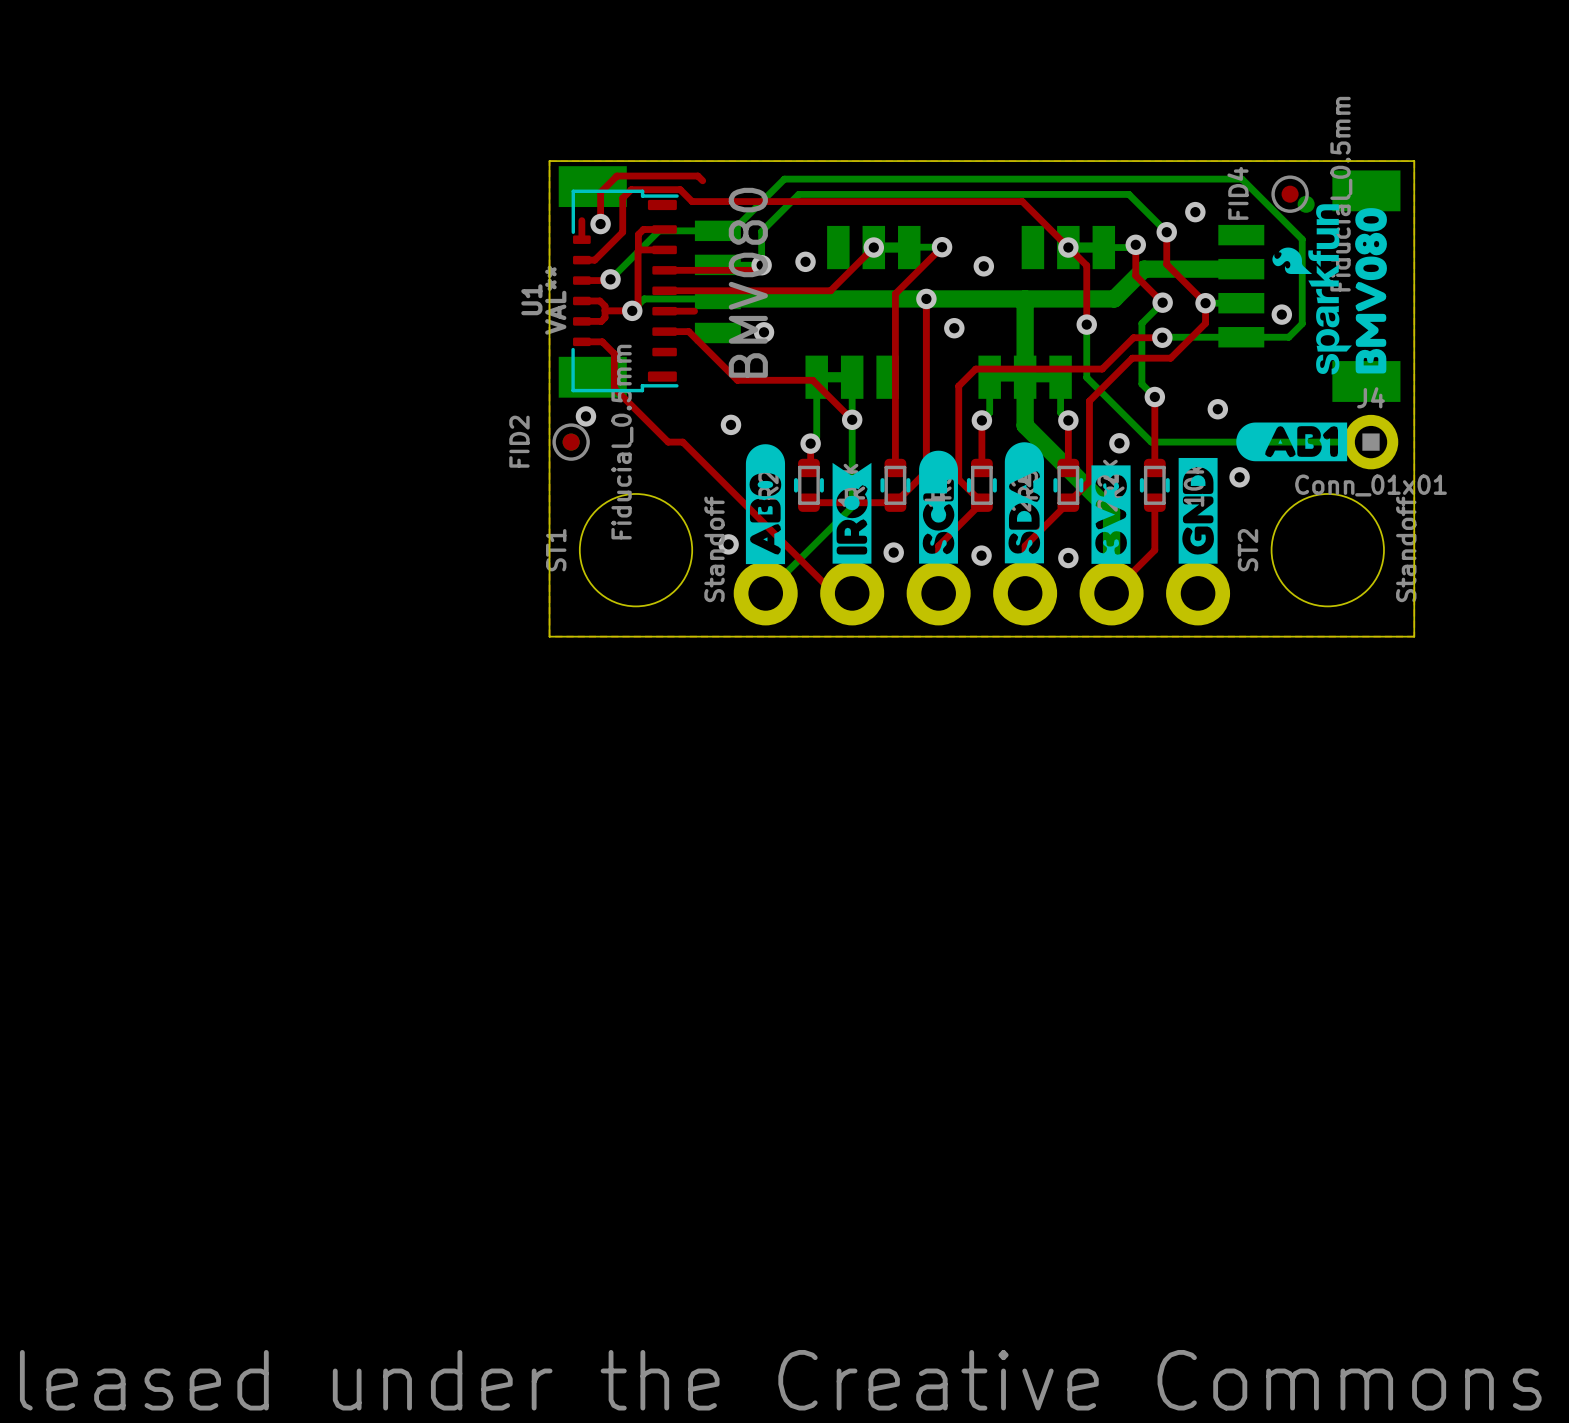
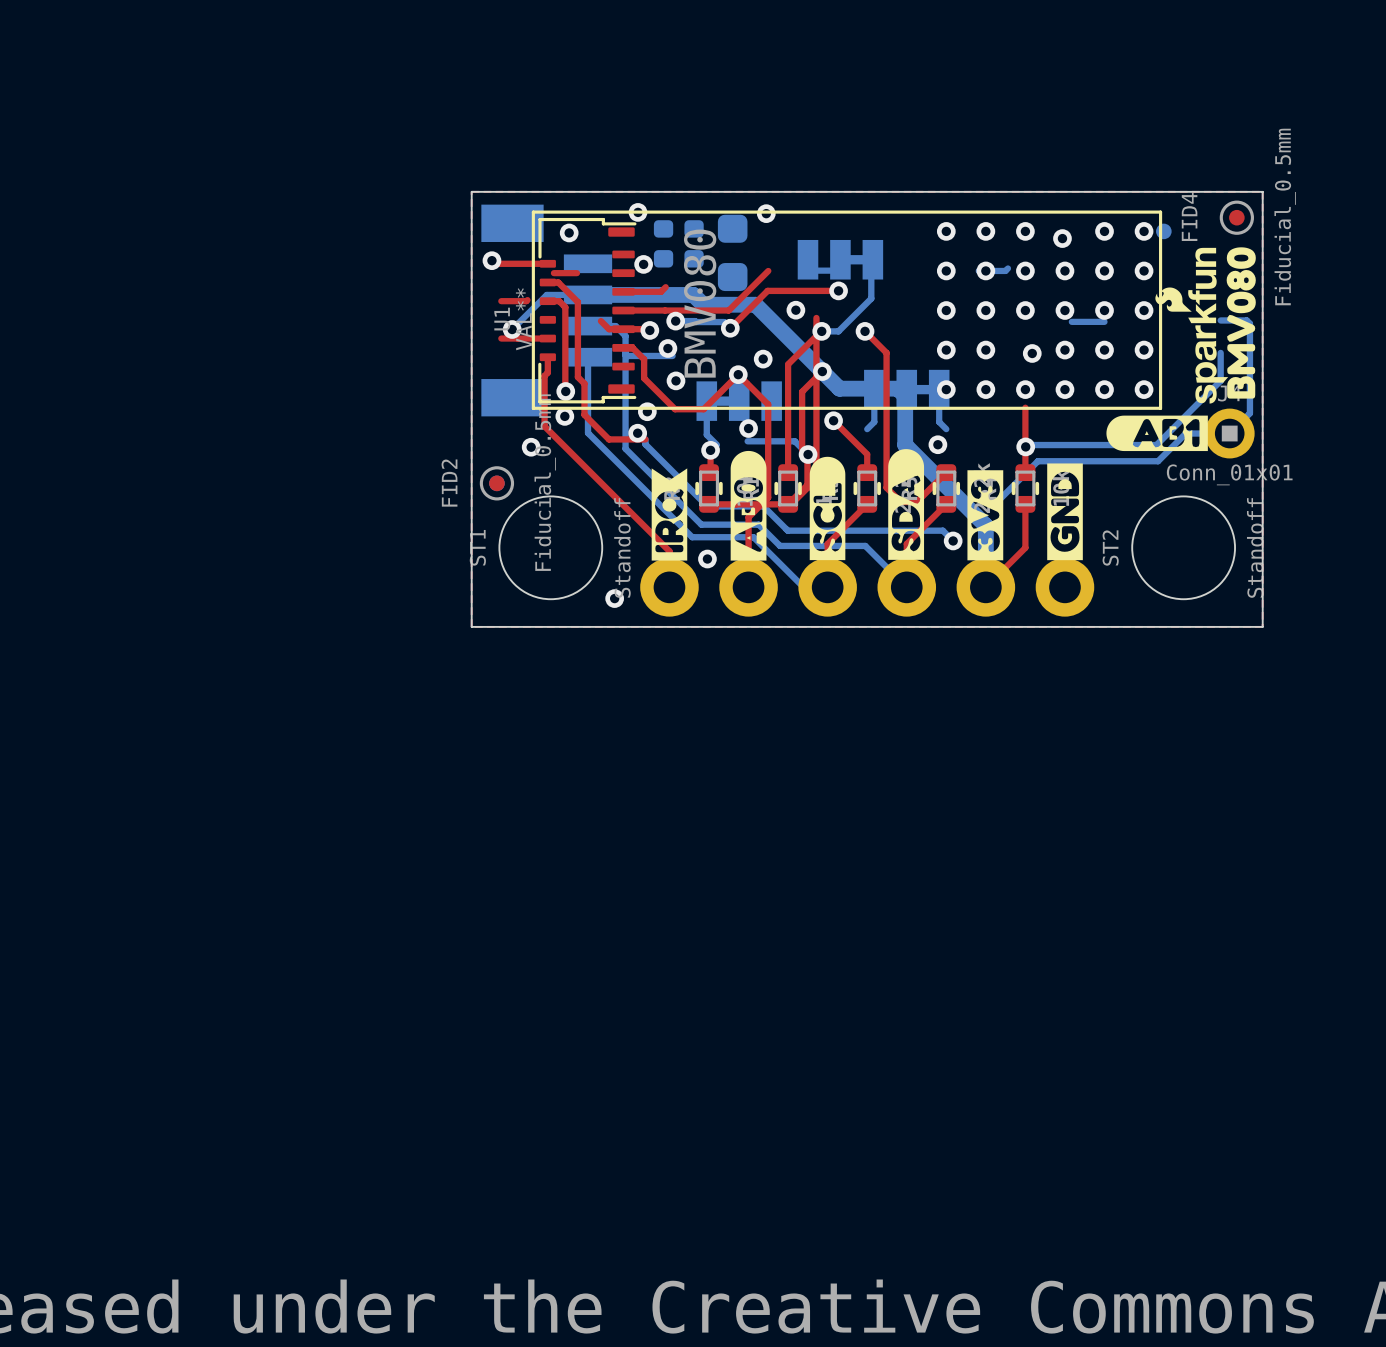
part footprint: [558, 166, 741, 398] -> [481, 204, 613, 417]
top track: (702, 180) (697, 176) (616, 176) (600, 192) (600, 224) -> none
line: none -> (533, 212) (1160, 212) (1160, 408) (533, 408) (533, 212)
via: none -> (638, 212)
via: none -> (766, 213)
FID4 position: (1290, 194) -> (1236, 217)
via: none -> (946, 231)
via: none -> (985, 231)
via: none -> (1025, 231)
via: none -> (1104, 231)
via: none -> (1144, 231)
via: none -> (569, 232)
part: none -> (663, 243)
part: none -> (694, 243)
top track: (581, 220) (581, 239) -> none
via: (600, 224) -> none
part: none -> (732, 252)
top track: (664, 229) (643, 229) (638, 234) (638, 305) (632, 310) (605, 310) -> none
top track: (1166, 232) (1166, 264) (1205, 303) (1205, 323) (1170, 358) (1132, 358) (1089, 401) (1089, 481) (1068, 502) -> none
bottom track: (1166, 232) (1128, 194) (798, 194) (761, 231) (761, 265) (718, 265) -> none
via: (1166, 232) -> none
part: none -> (840, 259)
bottom track: none -> (871, 259) (871, 298) (838, 331) (821, 331)
top track: none -> (491, 260) (495, 263) (547, 263)
via: none -> (491, 260)
via: none -> (643, 264)
top track: (1135, 244) (1135, 275) (1162, 302) -> none
via: (1135, 244) -> none
part: (873, 247) -> none
via: (873, 247) -> none
top track: (942, 247) (895, 293) (895, 349) -> (821, 331) (788, 364)
via: (942, 247) -> none
top track: (1068, 247) (1022, 201) (692, 201) (680, 189) (631, 189) (622, 198) (622, 232) (594, 260) (581, 260) -> none
top track: (1068, 247) (1086, 265) (1086, 324) -> none
part: (1068, 247) -> none
via: none -> (985, 270)
via: none -> (1025, 270)
via: none -> (1064, 270)
via: none -> (1104, 270)
via: none -> (1144, 270)
top track: none -> (547, 282) (558, 282) (577, 302) (577, 377) (584, 383) (584, 414) (609, 439) (645, 439)
via: (805, 261) -> none
via: (761, 265) -> none
via: (983, 266) -> none
top track: none -> (838, 290) (767, 290) (730, 328)
via: none -> (838, 290)
bottom track: (1241, 269) (1144, 269) (1114, 298) (644, 298) (632, 310) -> none
top track: (664, 270) (715, 270) -> none
bottom track: (610, 279) (659, 230) (732, 230) (784, 179) (1242, 179) (1302, 239) (1302, 323) (1288, 337) (1162, 337) -> none
via: (610, 279) -> none
top track: none -> (547, 301) (559, 301) (565, 307) (565, 391)
part: (1309, 286) -> none
drawing position: (1312, 289) -> (1191, 325)
U1 position: (625, 290) -> (587, 310)
top track: (664, 290) (715, 290) -> none
via: none -> (795, 310)
via: none -> (946, 310)
via: none -> (985, 310)
via: none -> (1104, 310)
via: none -> (1144, 310)
drawing position: (1371, 290) -> (1241, 322)
via position: (926, 298) -> (821, 331)
bottom track: (1025, 298) (1025, 425) (1111, 512) (1111, 526) -> (512, 329) (546, 294) (693, 294) (703, 304) (755, 304) (839, 388) (897, 388) (905, 396) (905, 445) (985, 525)
top track: (581, 300) (599, 300) (605, 306) (605, 317) (601, 321) -> (547, 338) (519, 338)
bottom track: none -> (1220, 320) (1246, 320) (1249, 323) (1249, 413) (1229, 433) (1185, 433) (1158, 461) (1037, 461) (998, 500) (993, 500)
top track: none -> (600, 321) (609, 329) (649, 330)
bottom track: none -> (675, 321) (724, 322) (730, 328)
via: none -> (675, 321)
bottom track: (1162, 302) (1141, 323) (1141, 384) (1154, 396) -> none
via position: (1162, 302) -> (1025, 310)
via position: (1205, 303) -> (1064, 310)
bottom track: none -> (588, 326) (615, 326) (625, 336) (625, 448) (701, 524) (758, 524) (780, 545) (865, 545) (906, 587)
via: (632, 310) -> none
via: none -> (730, 328)
via: none -> (512, 329)
top track: (664, 311) (694, 311) -> none
via: none -> (649, 330)
via: none -> (865, 331)
via position: (1281, 314) -> (1144, 350)
bottom track: (1086, 324) (1086, 377) (1151, 442) (1371, 442) -> none
via position: (1086, 324) -> (946, 350)
via: (954, 328) -> none
top track: (664, 331) (688, 331) (737, 380) (812, 380) (852, 419) -> none
via: none -> (985, 350)
via: none -> (1064, 350)
via: none -> (1104, 350)
top track: (1162, 337) (1133, 337) (1102, 369) (975, 369) (958, 386) (958, 479) (981, 502) -> none
bottom track: none -> (1220, 352) (1220, 380) (1156, 445) (1027, 445) (1025, 446)
bottom track: none -> (625, 355) (672, 355)
top track: (581, 341) (602, 341) (614, 353) (614, 388) (668, 442) (682, 442) (834, 593) (852, 593) -> (623, 347) (632, 347) (644, 359) (644, 378) (675, 409) (703, 409) (738, 374) (768, 404) (768, 497) (748, 517) (748, 587)
top track: none -> (547, 357) (547, 372) (544, 375) (544, 426) (669, 551) (669, 587)
bottom track: none -> (588, 357) (588, 433) (692, 537) (753, 537) (803, 587) (827, 587)
via: none -> (763, 359)
top track: none -> (822, 371) (802, 391) (802, 449) (807, 455) (807, 487) (791, 504) (788, 504)
via: none -> (822, 371)
via: none -> (738, 374)
via: none -> (676, 380)
bottom track: (816, 377) (816, 437) (810, 443) -> none
bottom track: (852, 377) (852, 506) (765, 593) -> none
part position: (852, 377) -> (739, 401)
via: none -> (946, 389)
via: none -> (985, 389)
via: none -> (1064, 389)
via: none -> (1104, 389)
via: none -> (1144, 389)
via: none -> (565, 391)
bottom track: none -> (706, 401) (706, 434) (716, 444)
via position: (1154, 396) -> (1025, 389)
via: none -> (647, 411)
via: none -> (564, 416)
via: (1217, 409) -> none
via: none -> (833, 420)
via: (585, 416) -> none
top track: (981, 420) (981, 448) -> (833, 420) (867, 454)
via: (981, 420) -> none
top track: (1068, 420) (1068, 467) -> (865, 331) (886, 352) (886, 487) (900, 502) (916, 502) (946, 472)
via position: (1068, 420) -> (937, 444)
bottom track: none -> (645, 439) (645, 444) (707, 506) (763, 506) (787, 530) (942, 530) (953, 540)
bottom track: none -> (747, 441) (794, 441) (808, 454)
via: none -> (1025, 446)
via: none -> (531, 447)
drawing position: (1291, 441) -> (1157, 433)
FID2 position: (571, 442) -> (496, 483)
J4 position: (1371, 442) -> (1229, 433)
via: (1119, 443) -> none
via: none -> (808, 454)
via: (1239, 477) -> none
drawing position: (765, 504) -> (748, 505)
drawing position: (852, 513) -> (669, 514)
via: (728, 544) -> none
via: (893, 552) -> none
via: (981, 555) -> none
via position: (1068, 558) -> (953, 540)
via: none -> (707, 559)
via: none -> (614, 598)

